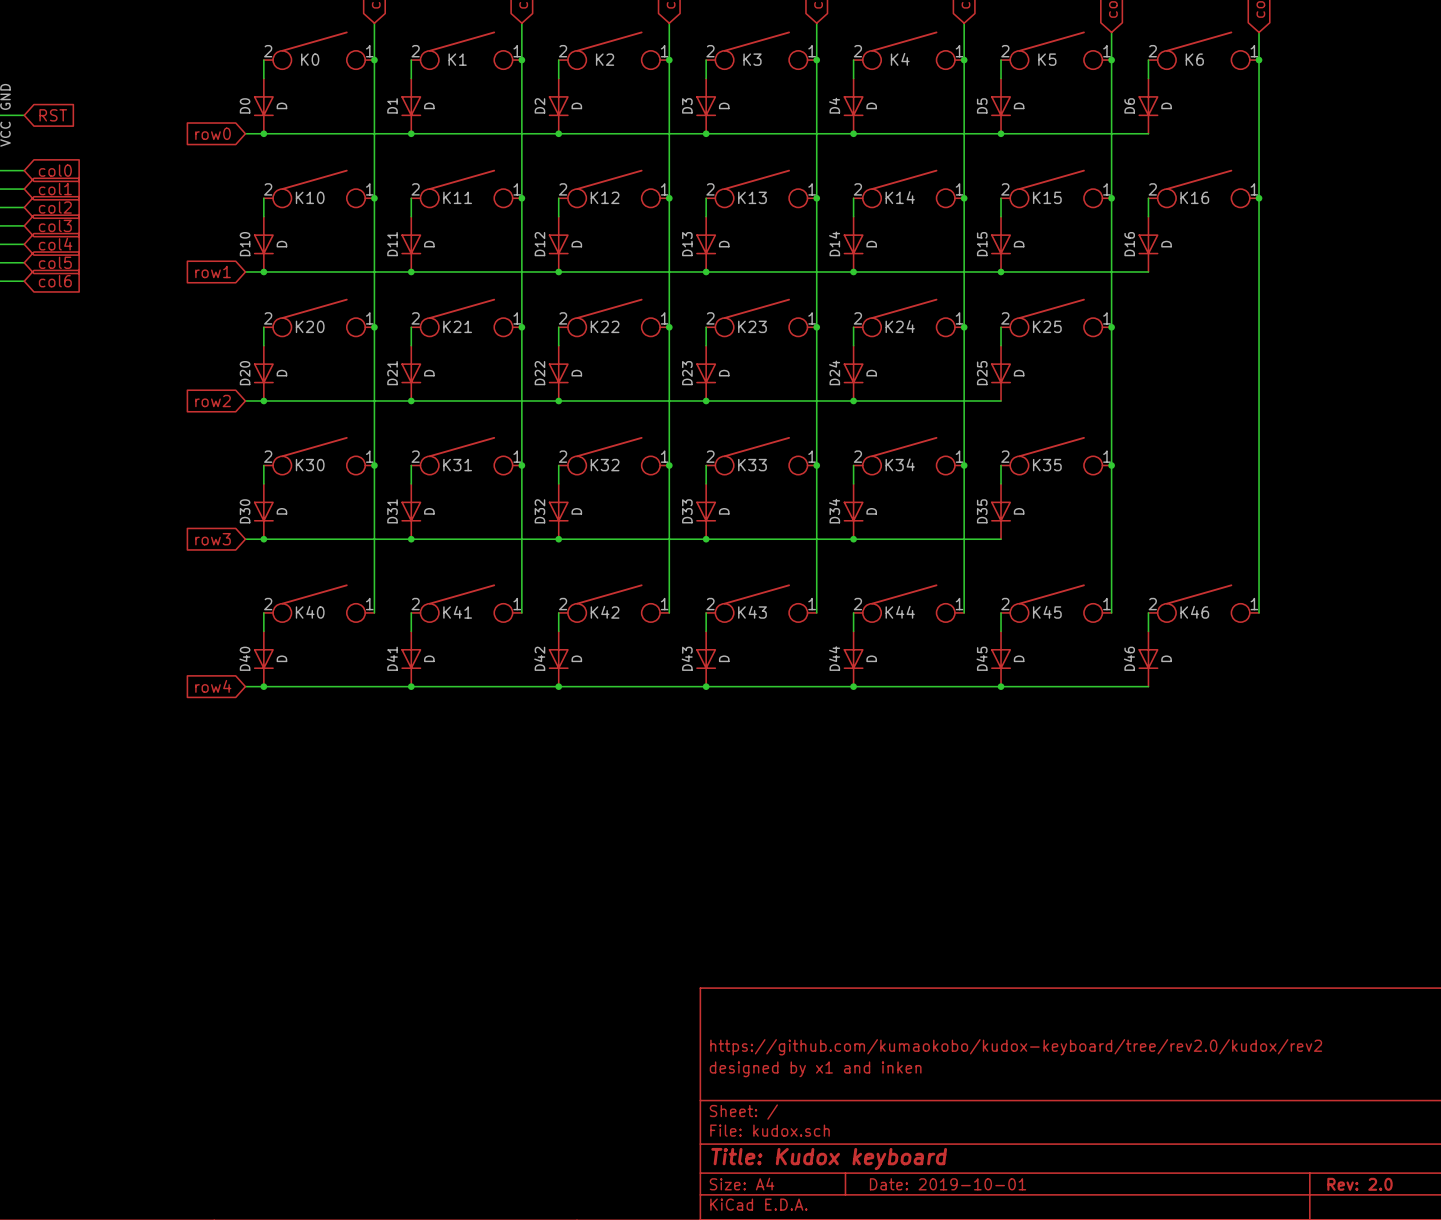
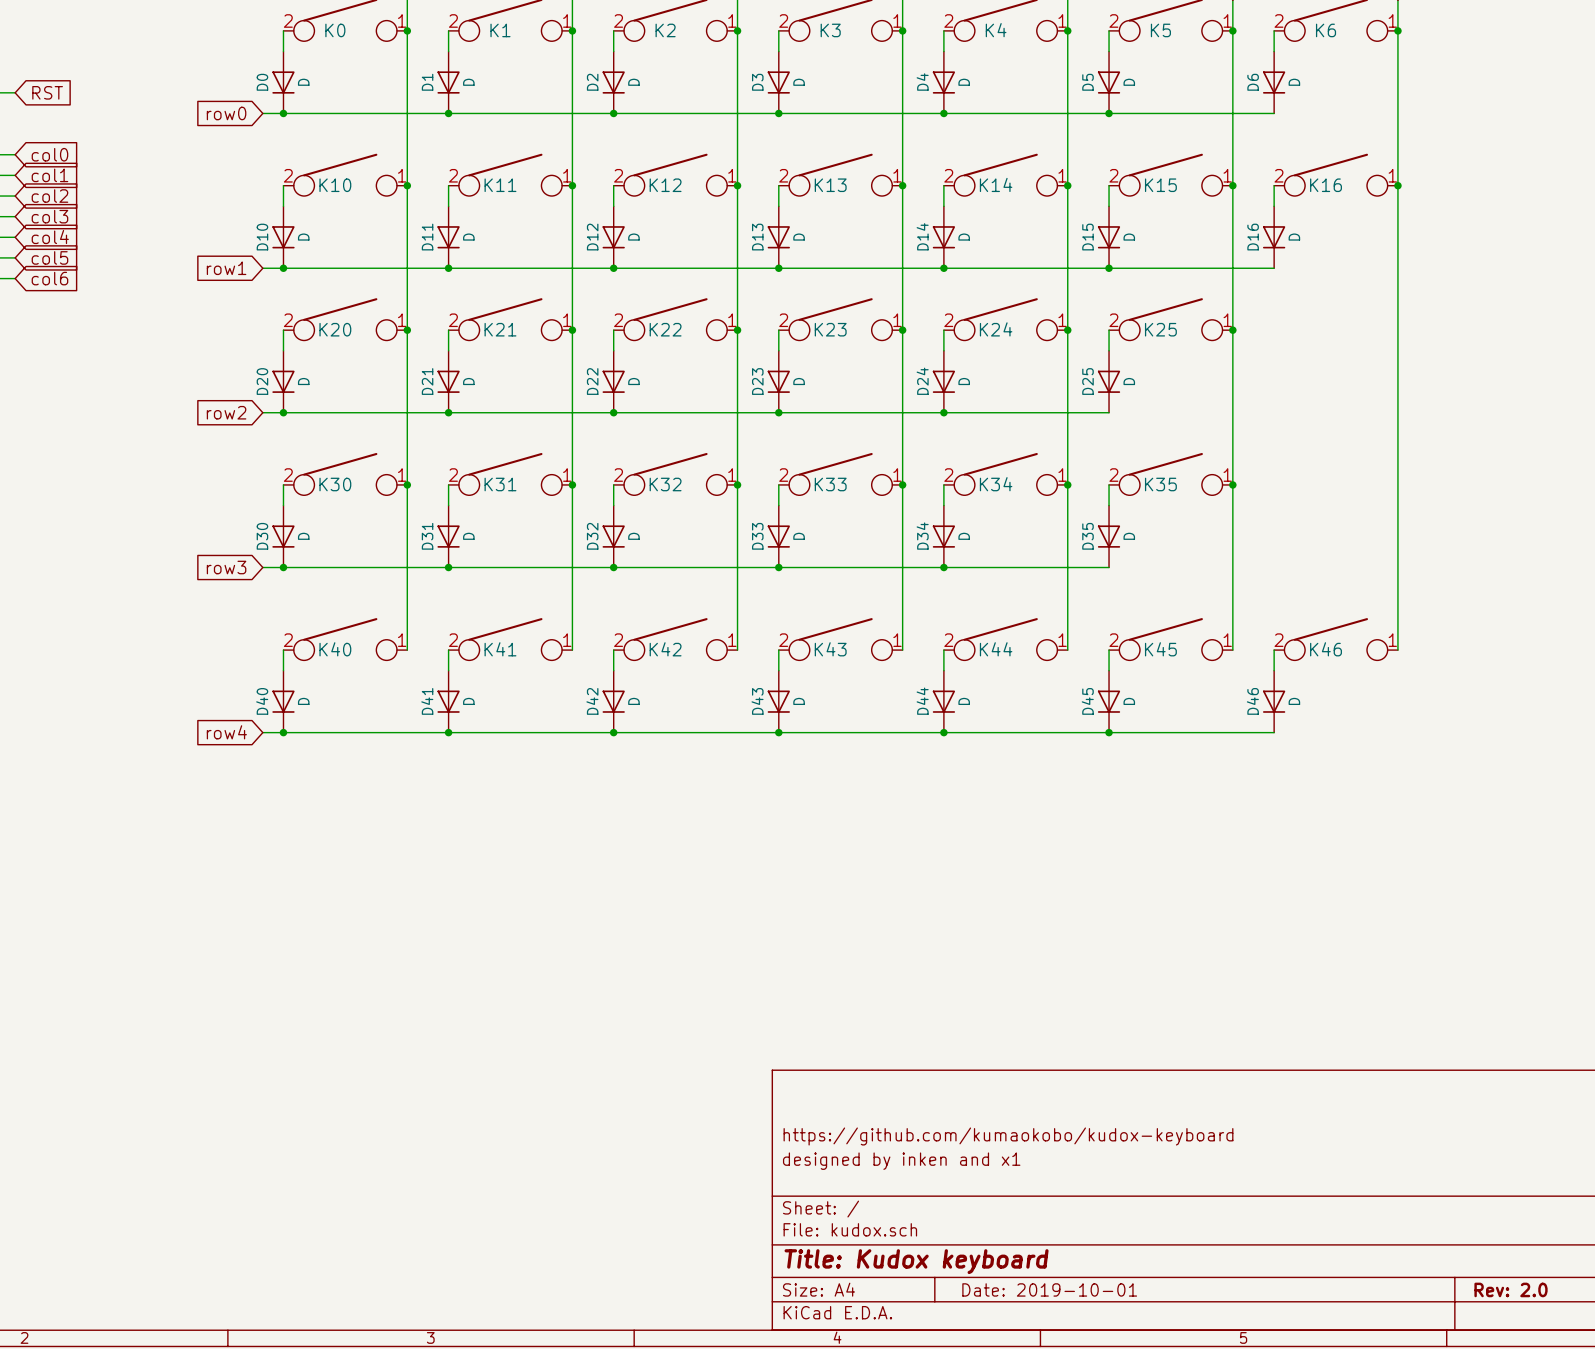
title block: https://github.com/kumaokobo/kudox-keyboard/tree/rev2.0/kudox/rev2 (1016, 1047) -> https://github.com/kumaokobo/kudox-keyboard (1008, 1136)
title block: designed by x1 and inken (815, 1069) -> designed by inken and x1 (901, 1161)

